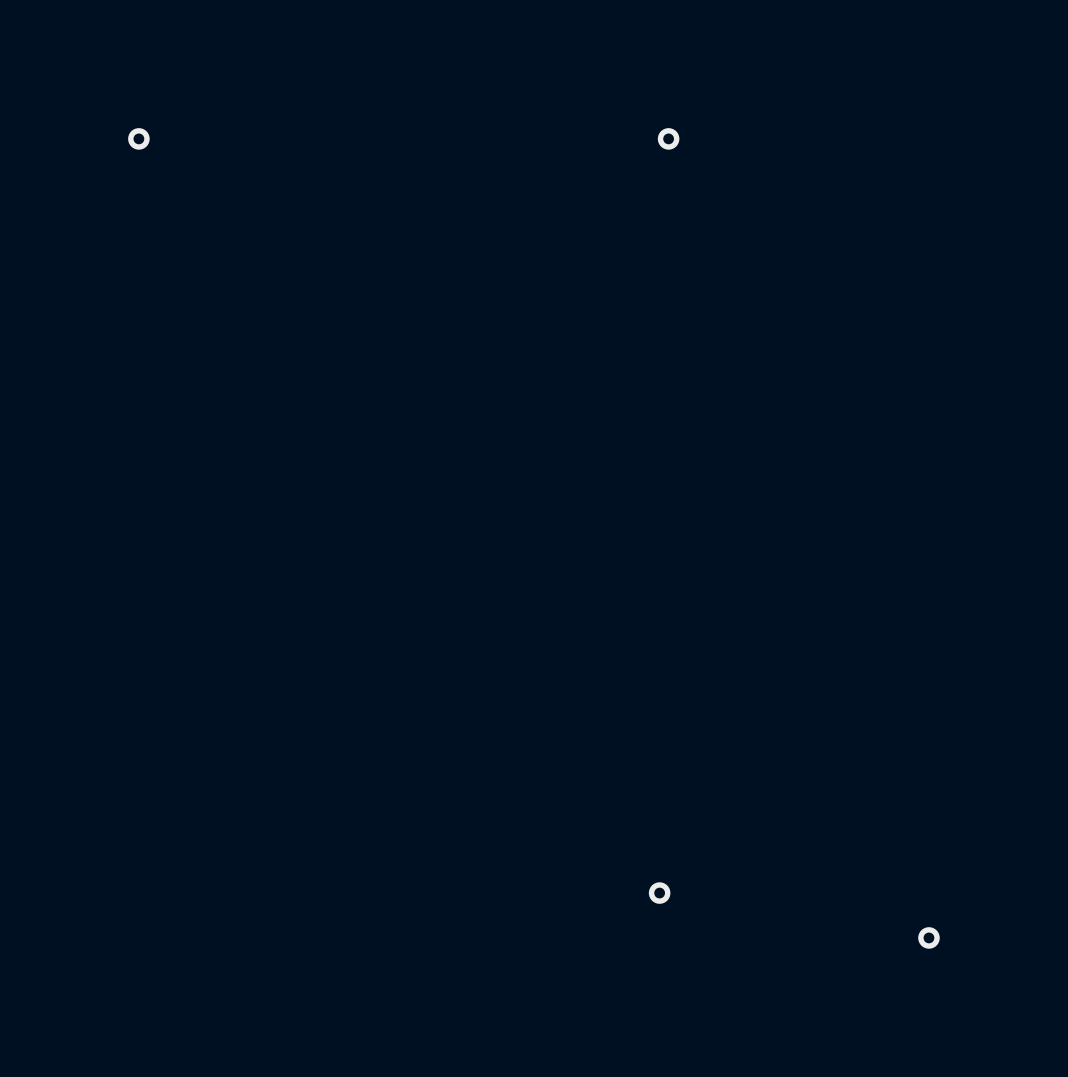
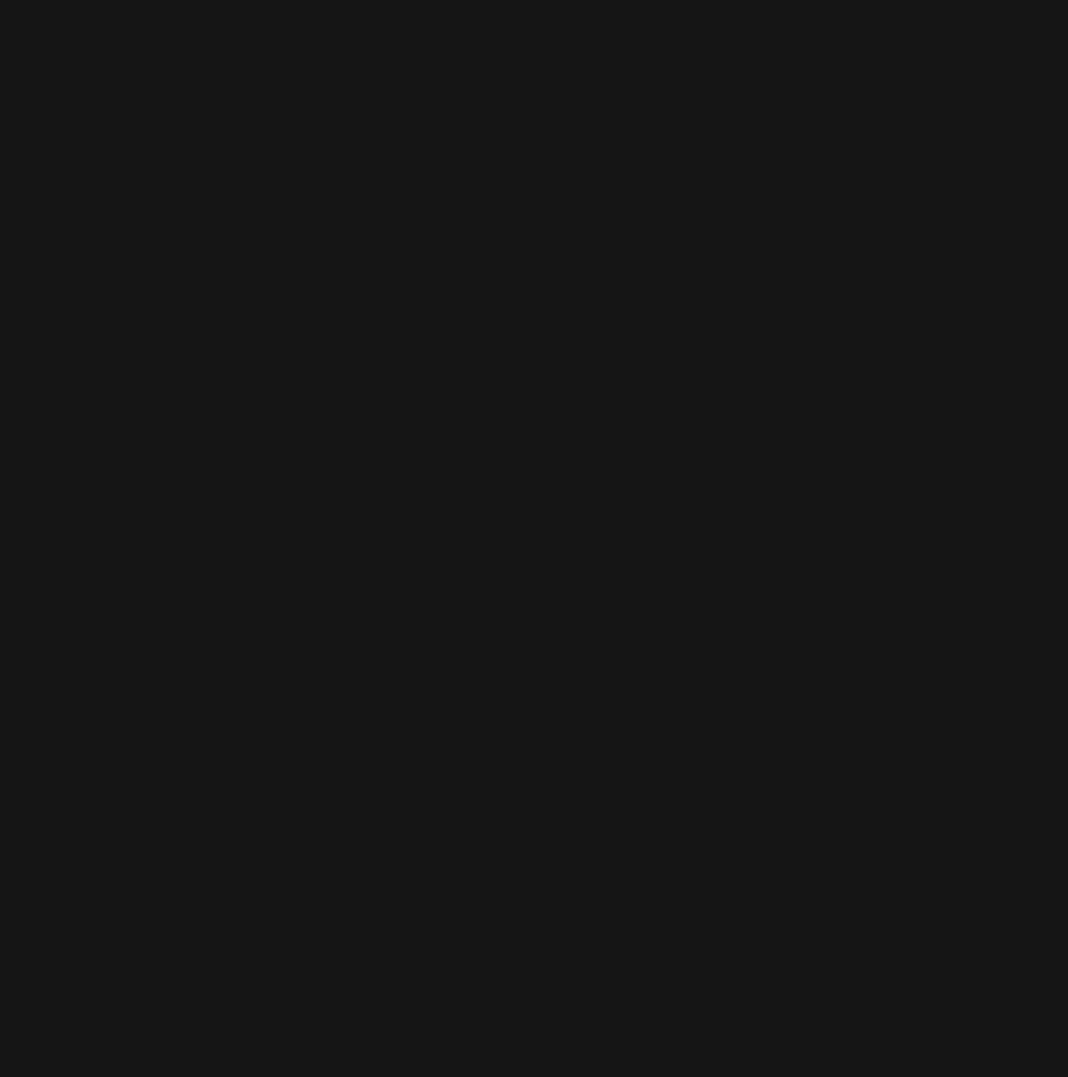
via: (138, 138) -> none
via: (668, 138) -> none
via: (659, 893) -> none
via: (928, 937) -> none

